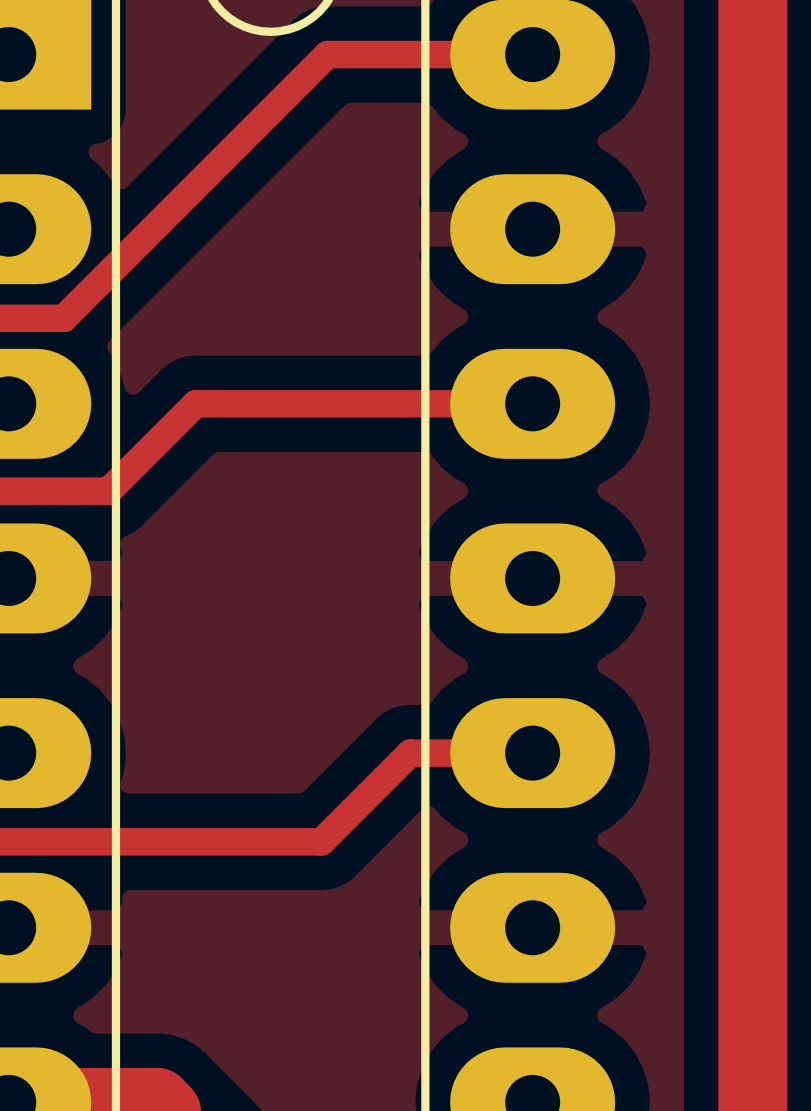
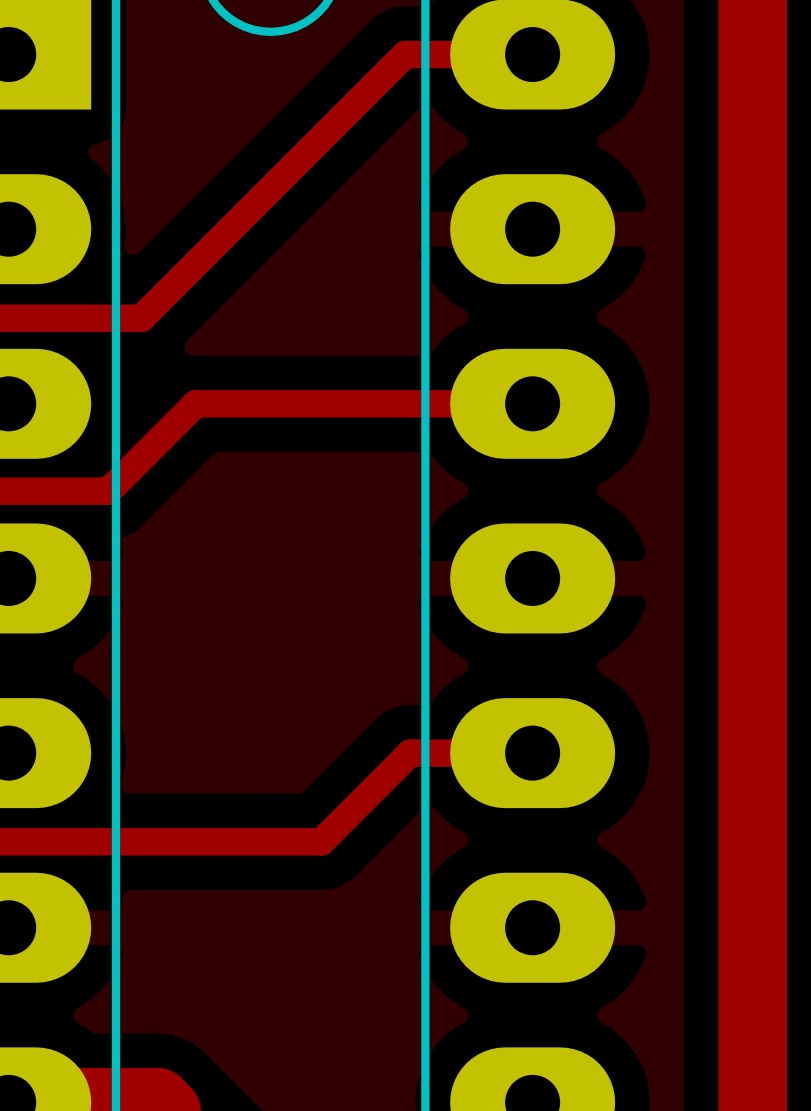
track: (405, 54) (327, 54) (63, 318) -> (405, 54) (141, 318) (63, 318)

